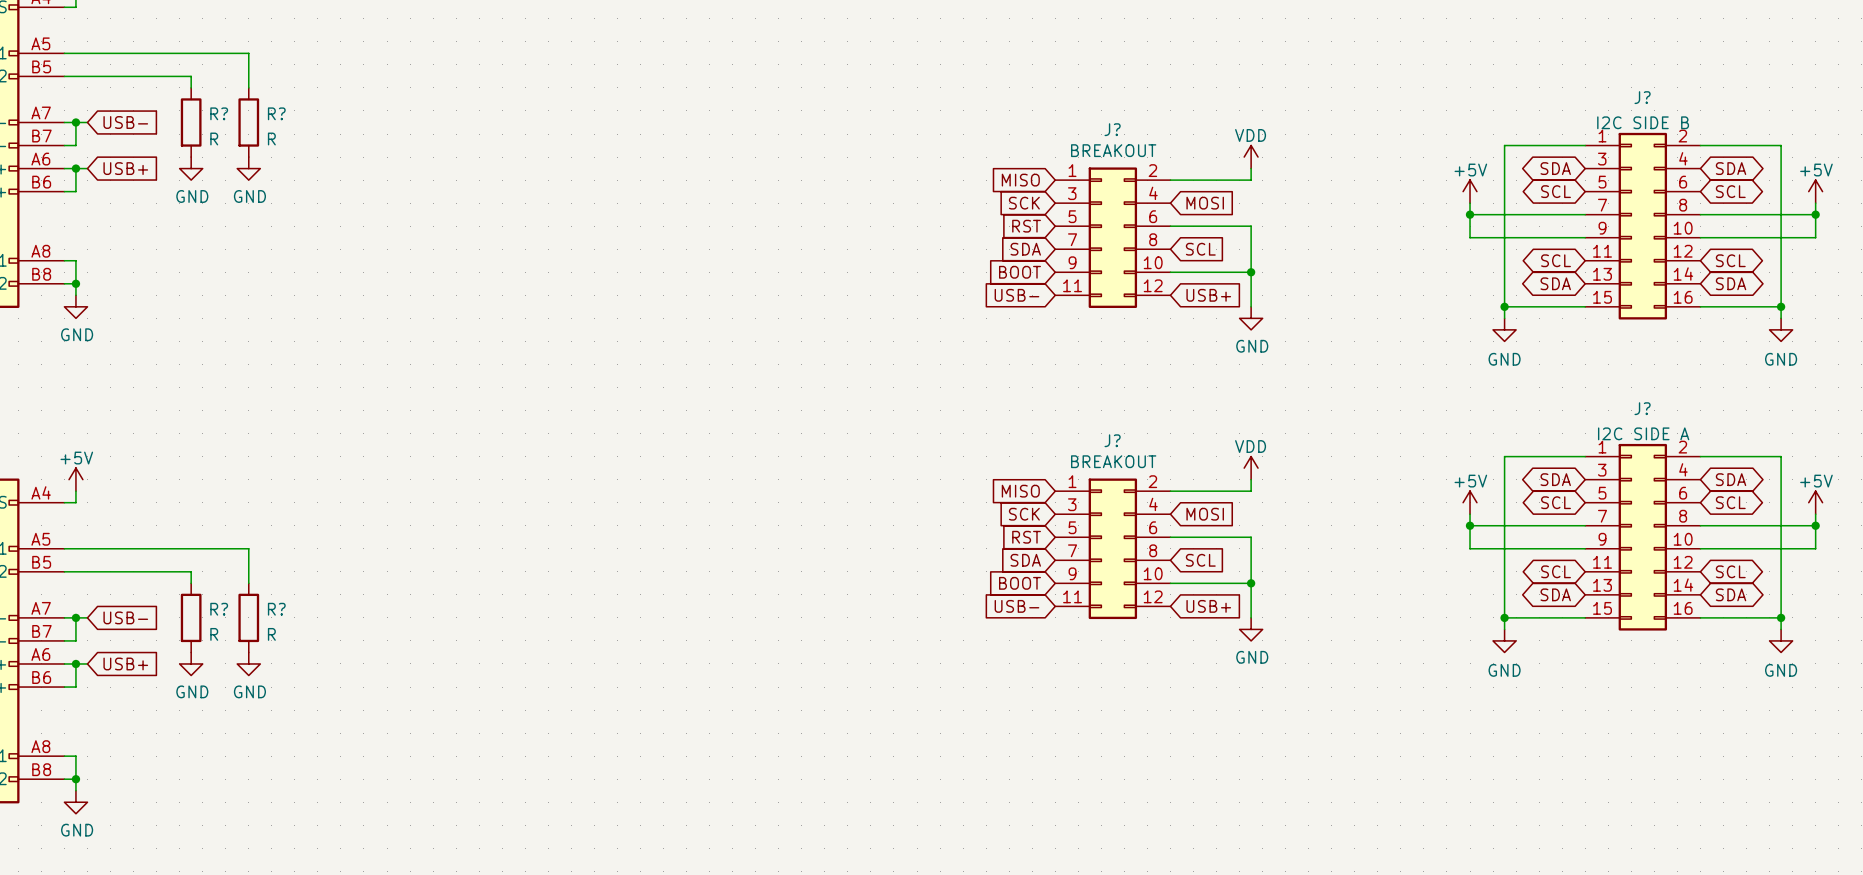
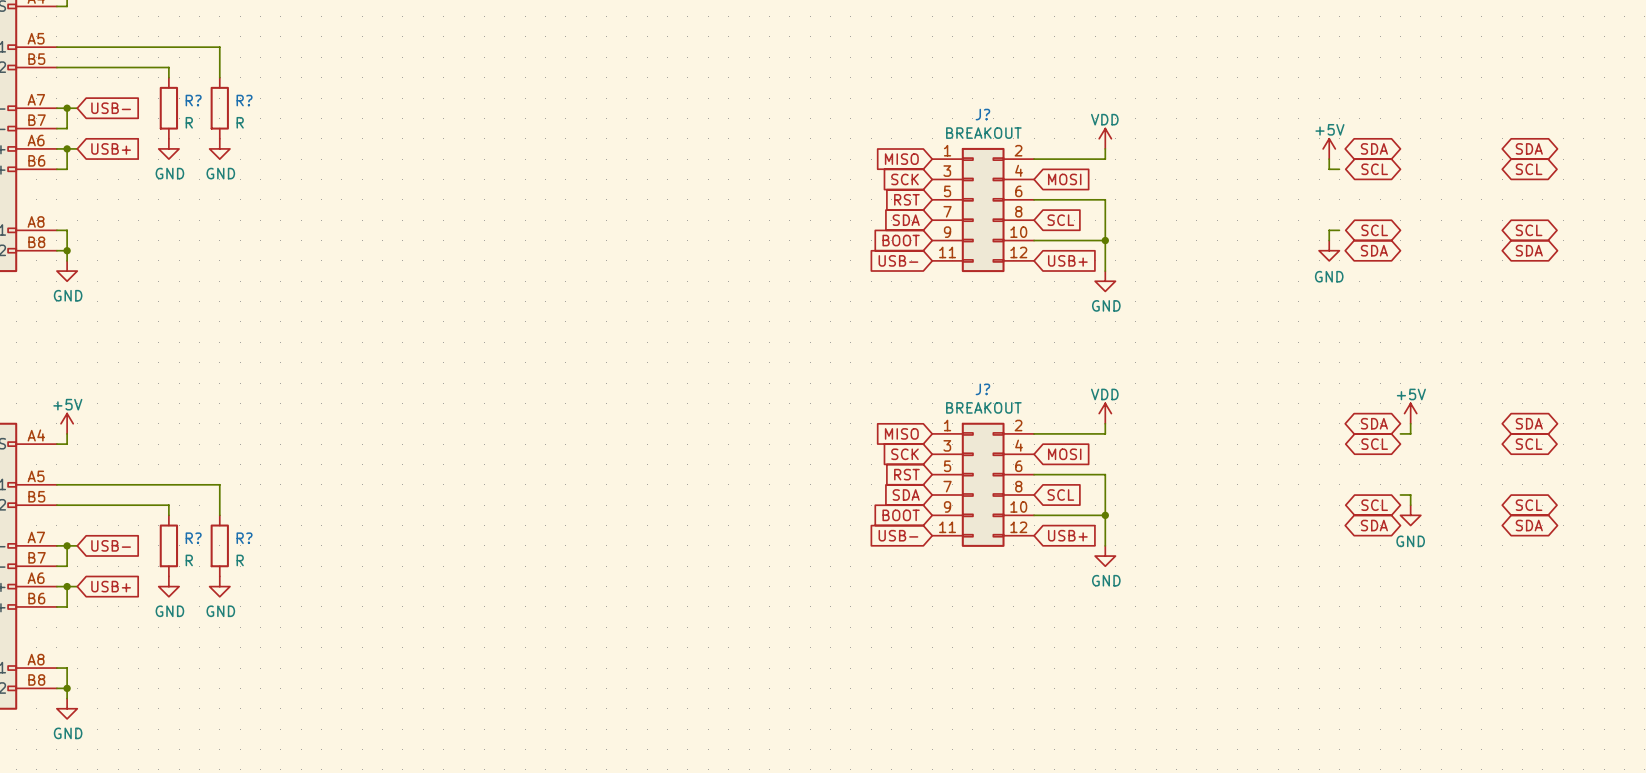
wire: (1585, 145) (1504, 145) (1504, 180) -> none
wire: (1700, 145) (1781, 145) (1781, 318) -> none
power symbol position: +5V (1470, 191) -> +5V (1329, 148)
wire: (1504, 191) (1504, 260) -> (1329, 169) (1339, 169)
power symbol: +5V (1815, 191) -> none
wire: (1470, 203) (1470, 237) (1585, 237) -> none
wire: (1815, 203) (1815, 237) (1700, 237) -> none
wire: (1470, 214) (1585, 214) -> none
junction: (1470, 214) -> none
wire: (1700, 214) (1815, 214) -> none
junction: (1815, 214) -> none
J?: I2C SIDE B (1642, 226) -> none
wire: none -> (1329, 230) (1339, 230)
wire: (1504, 272) (1504, 318) -> none
wire: (1504, 306) (1585, 306) -> none
junction: (1504, 306) -> none
wire: (1700, 306) (1781, 306) -> none
junction: (1781, 306) -> none
power symbol position: GND (1504, 329) -> GND (1329, 250)
power symbol: GND (1781, 329) -> none
wire: (1585, 456) (1504, 456) (1504, 629) -> none
wire: (1700, 456) (1781, 456) (1781, 629) -> none
power symbol: none -> +5V (1410, 413)
wire: none -> (1410, 423) (1410, 433) (1400, 433)
power symbol: +5V (1470, 502) -> none
power symbol: +5V (1815, 502) -> none
wire: (1470, 514) (1470, 548) (1585, 548) -> none
wire: (1815, 514) (1815, 548) (1700, 548) -> none
wire: (1470, 525) (1585, 525) -> none
junction: (1470, 525) -> none
wire: (1700, 525) (1815, 525) -> none
junction: (1815, 525) -> none
J?: I2C SIDE A (1642, 537) -> none
wire: none -> (1400, 495) (1410, 495) (1410, 505)
power symbol: none -> GND (1410, 515)
wire: (1504, 617) (1585, 617) -> none
junction: (1504, 617) -> none
wire: (1700, 617) (1781, 617) -> none
junction: (1781, 617) -> none
power symbol: GND (1504, 640) -> none
power symbol: GND (1781, 640) -> none

